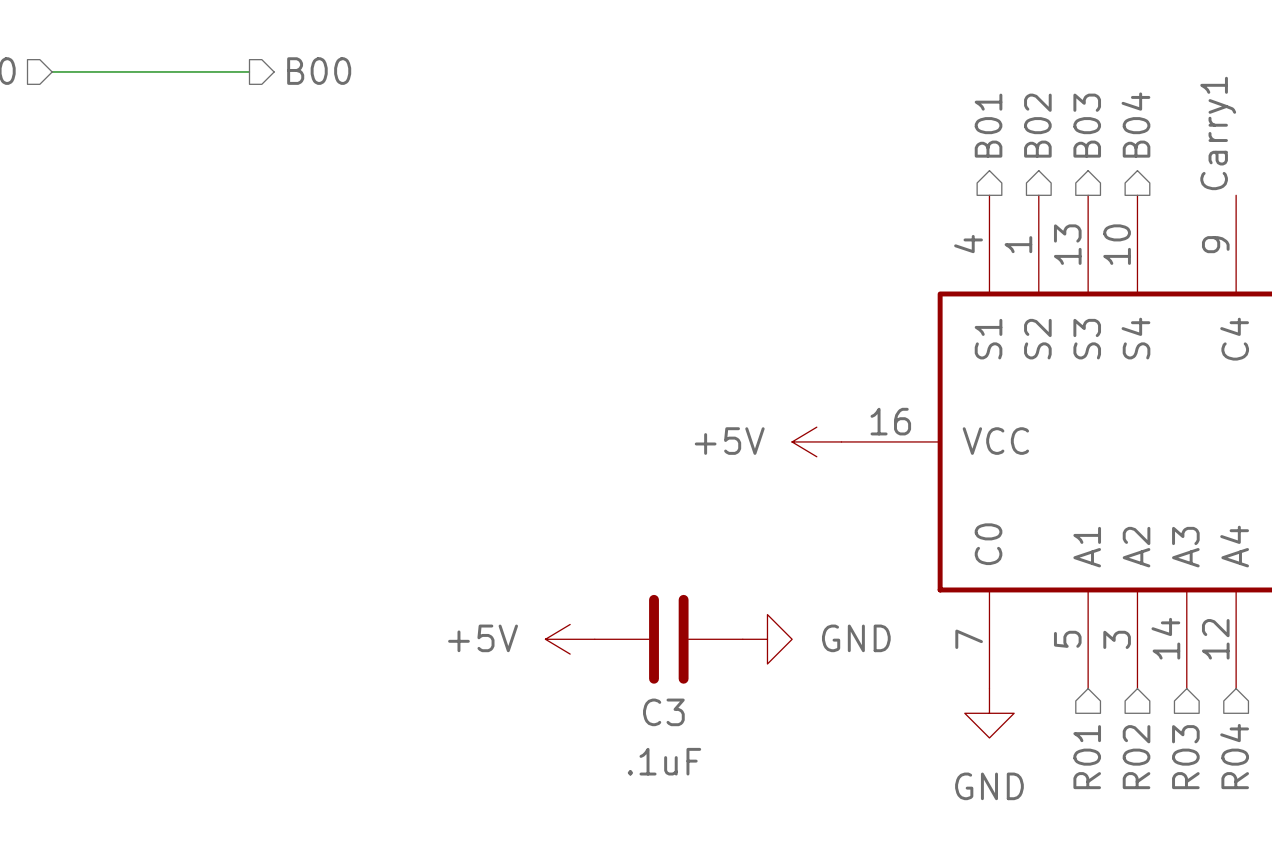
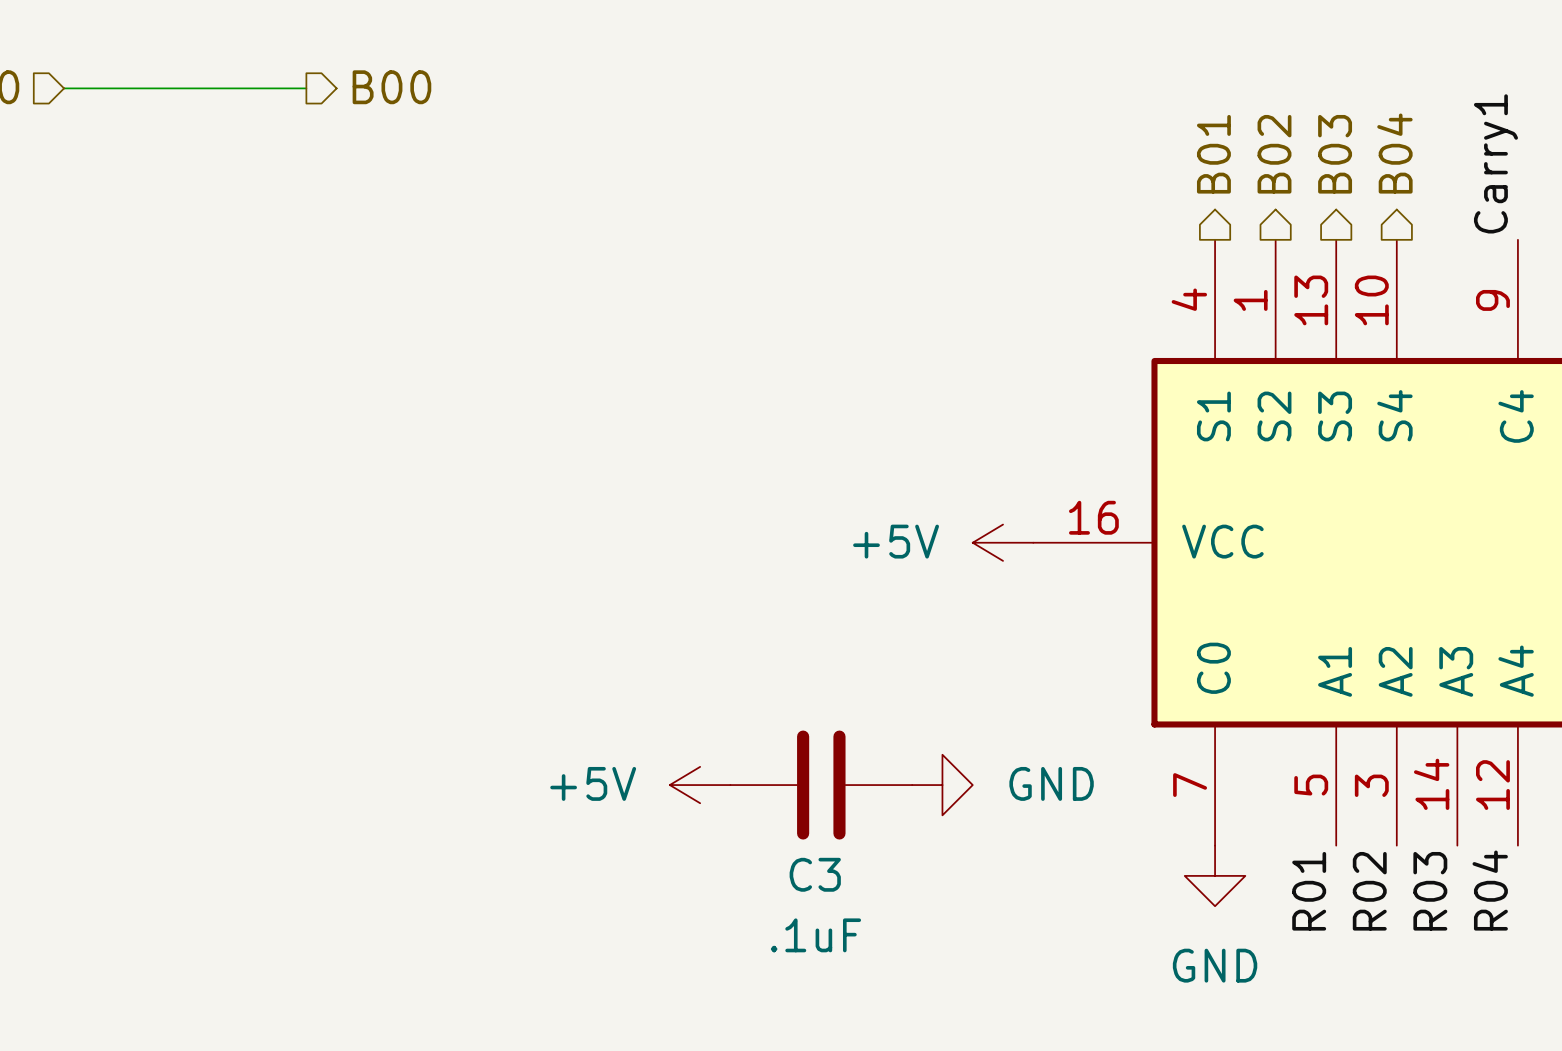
label: none -> R01 (1309, 891)
label: none -> R02 (1369, 891)
label: none -> R03 (1430, 891)
label: none -> R04 (1490, 890)
hierarchical label: R04 (1234, 756) -> none
hierarchical label: R01 (1087, 757) -> none
hierarchical label: R02 (1136, 757) -> none
hierarchical label: R03 (1185, 757) -> none

